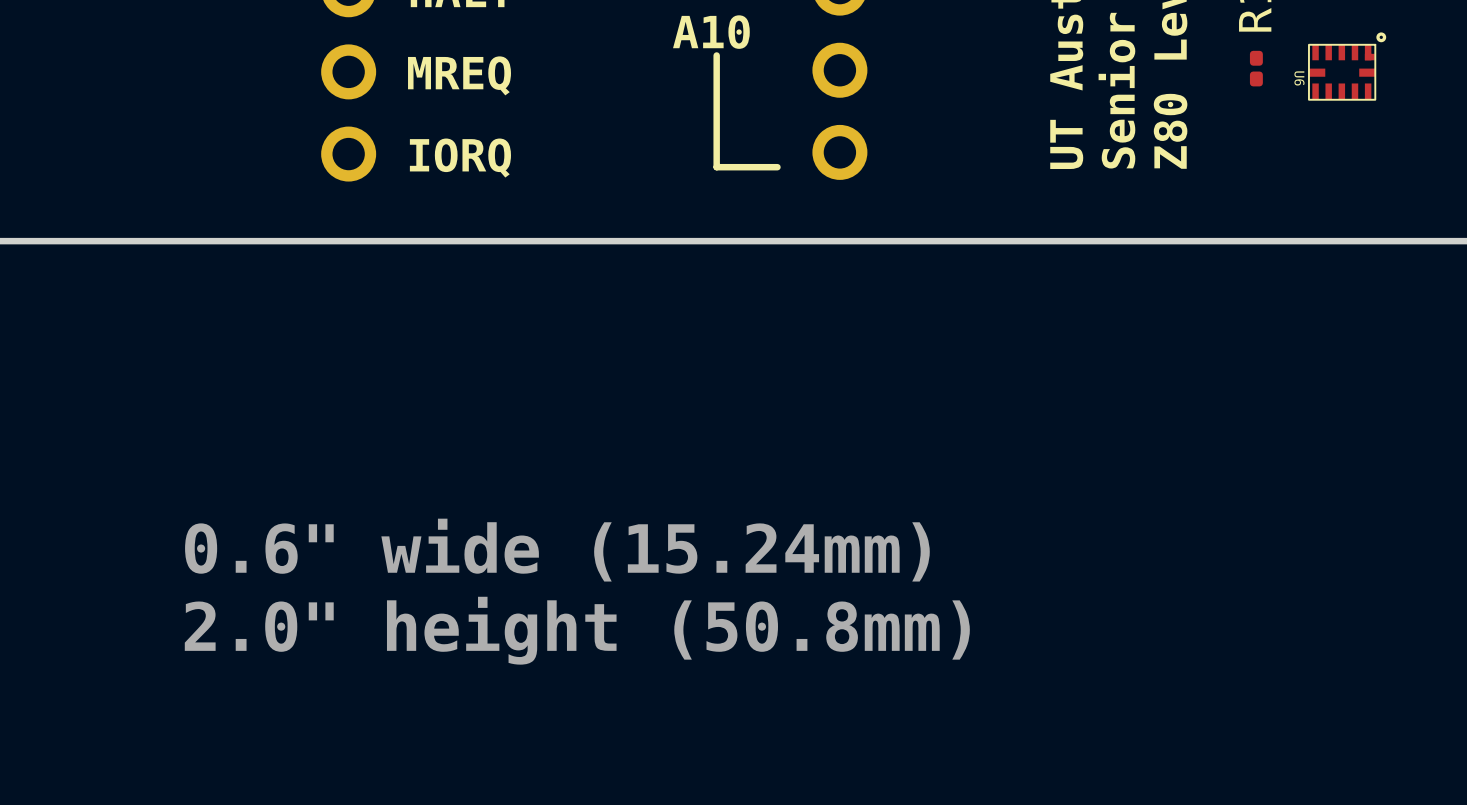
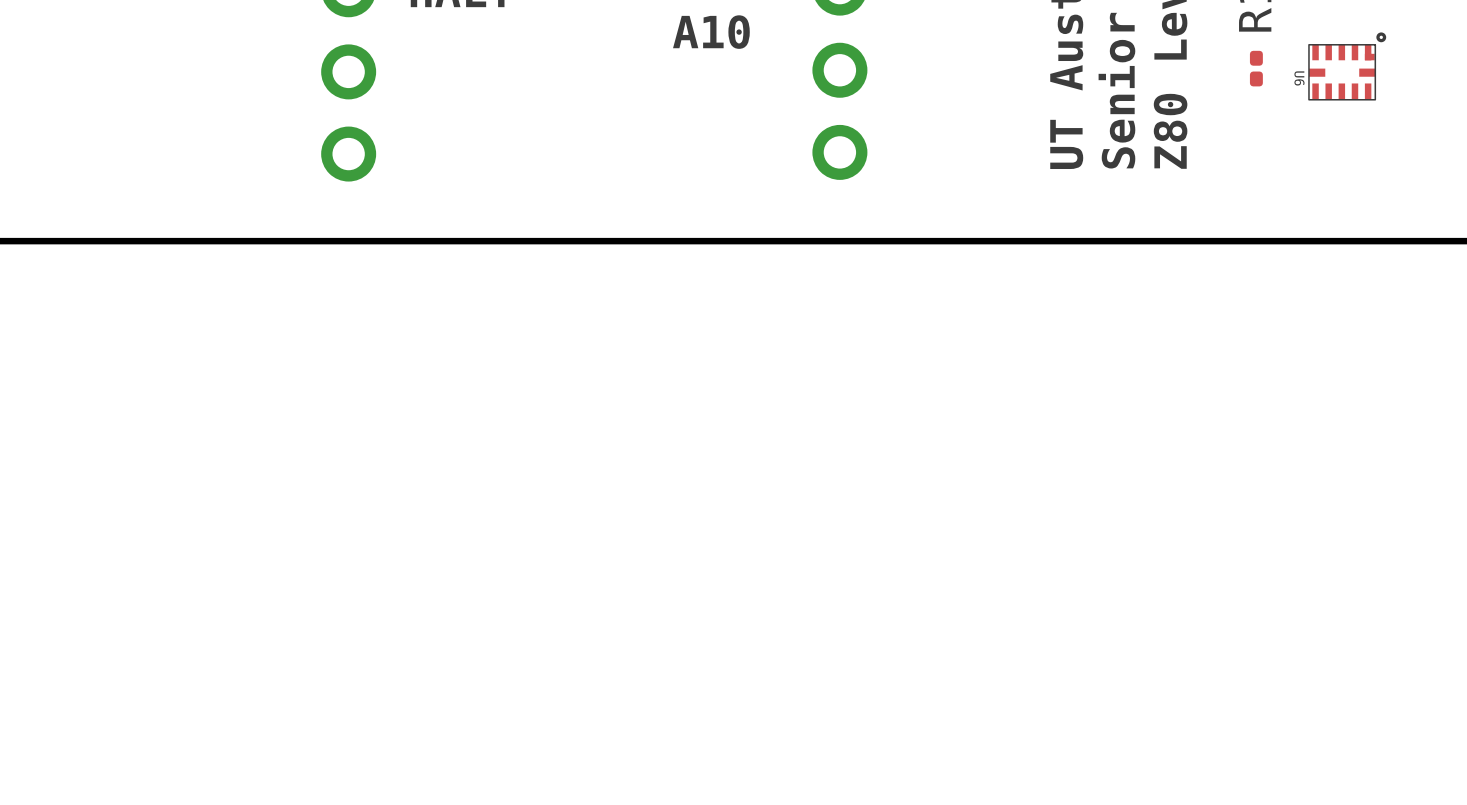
line: (716, 55) (716, 167) (777, 167) -> none
text: MREQ (459, 75) -> none
text: IORQ (460, 158) -> none
text: 0.6" wide (15.24mm) (557, 550) -> none
text: 2.0" height (50.8mm) (577, 630) -> none

